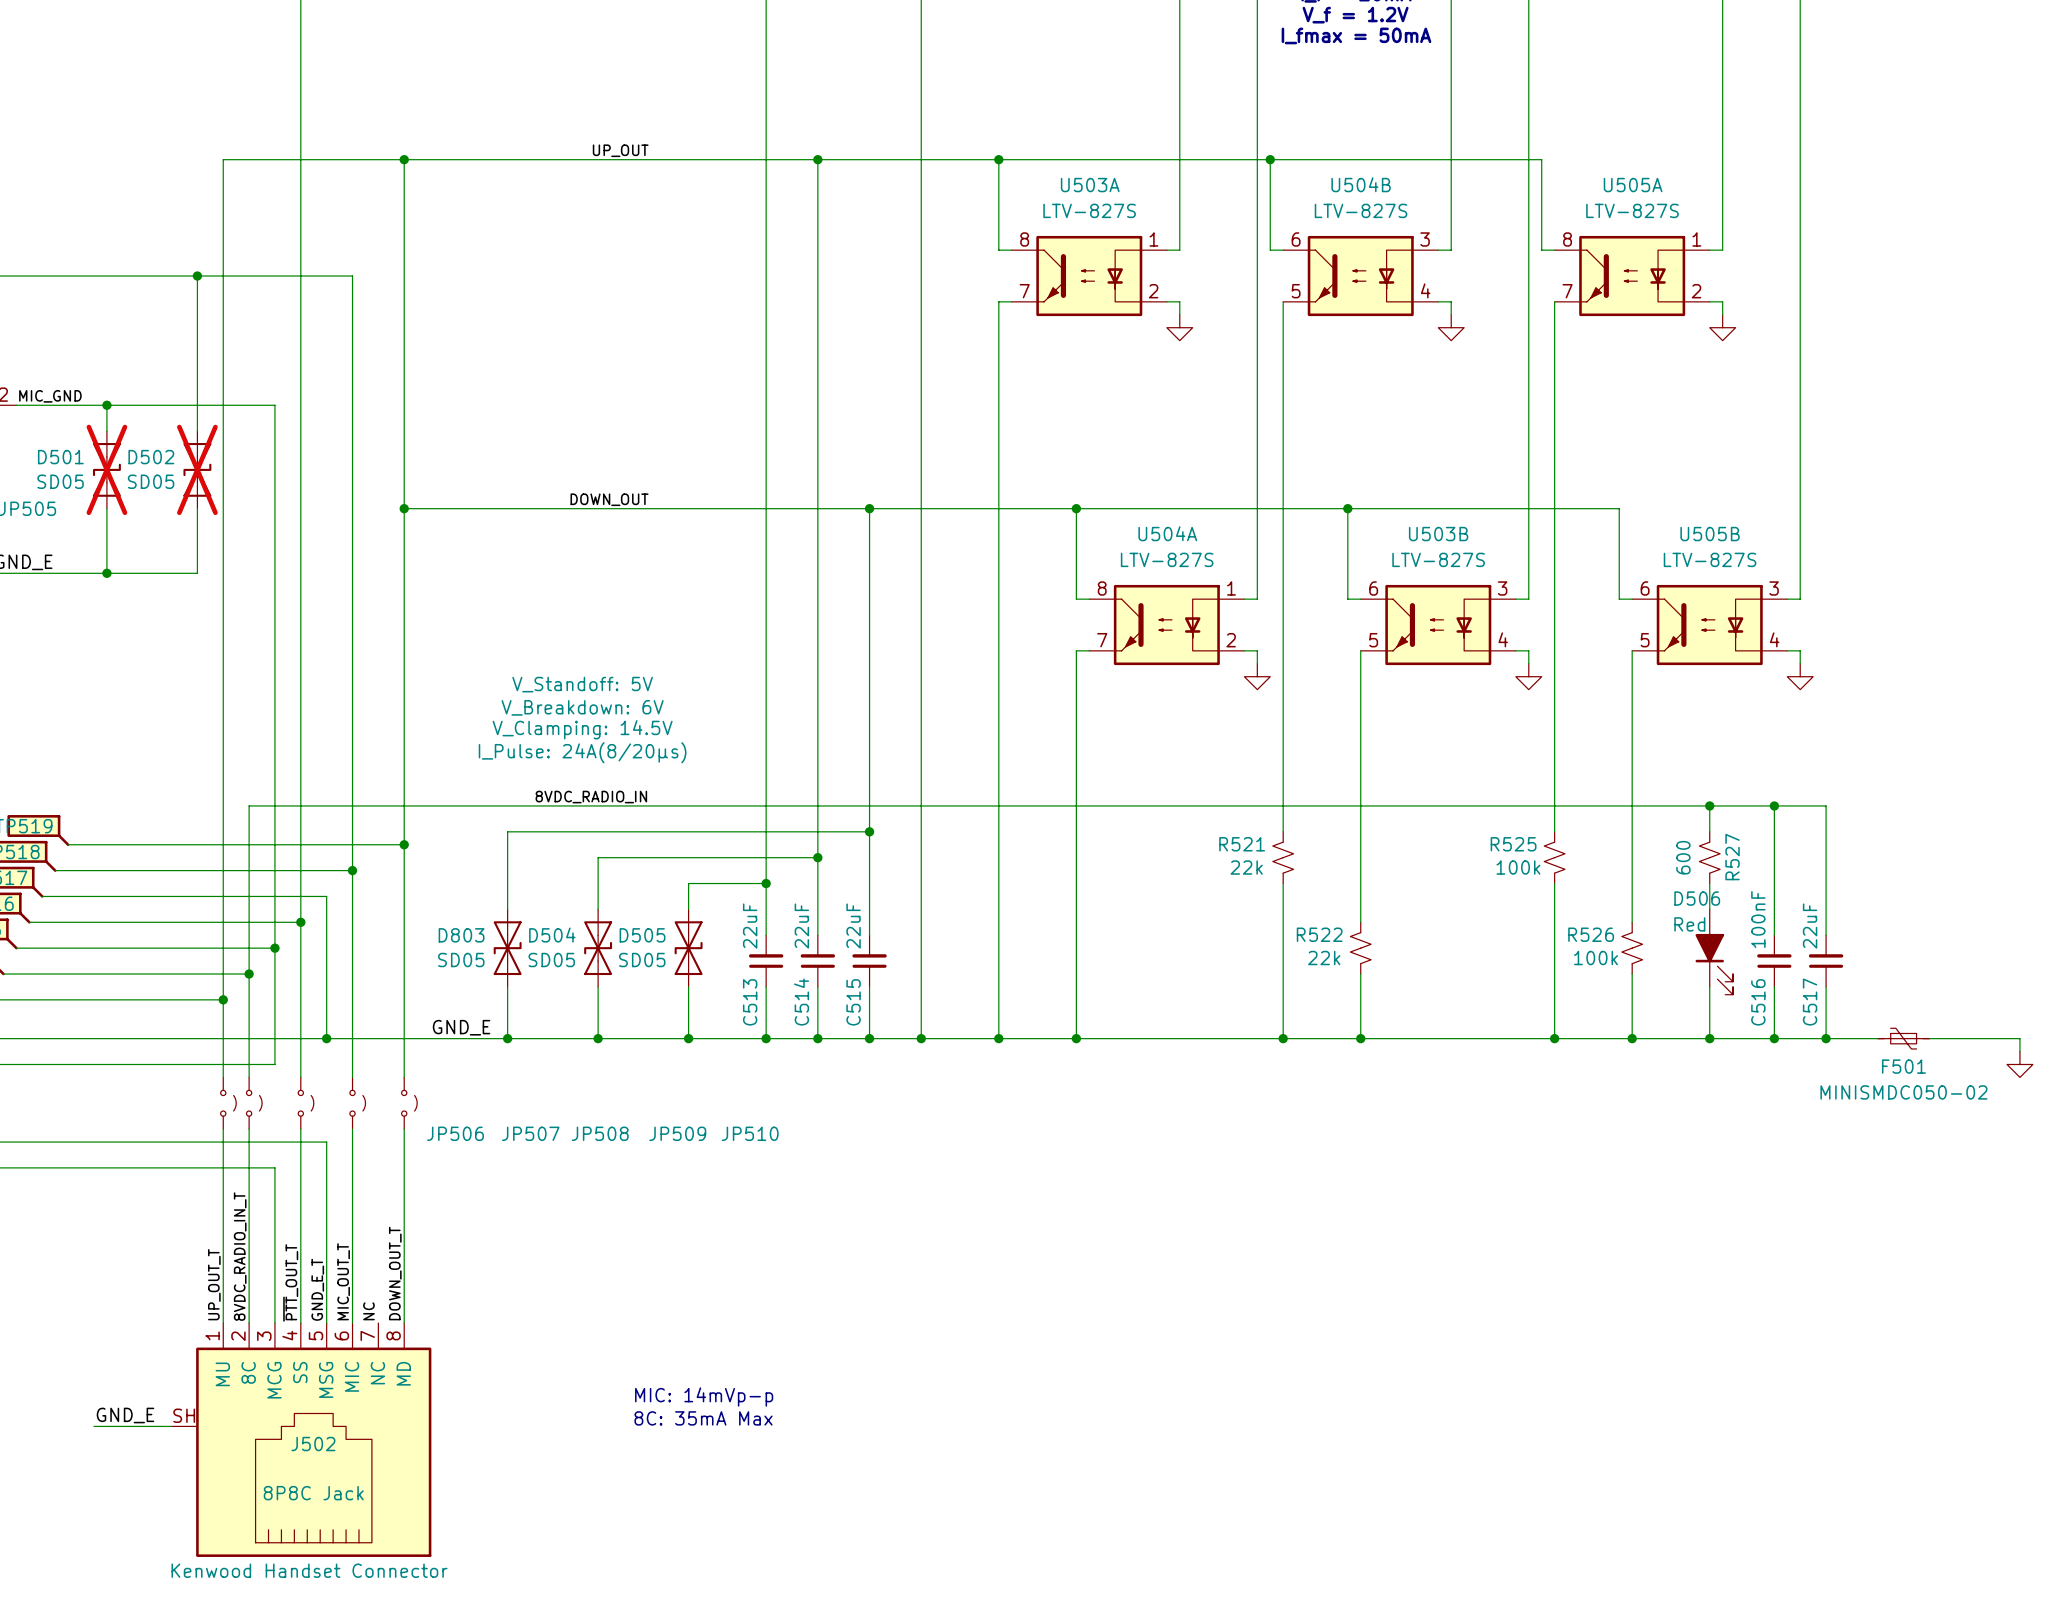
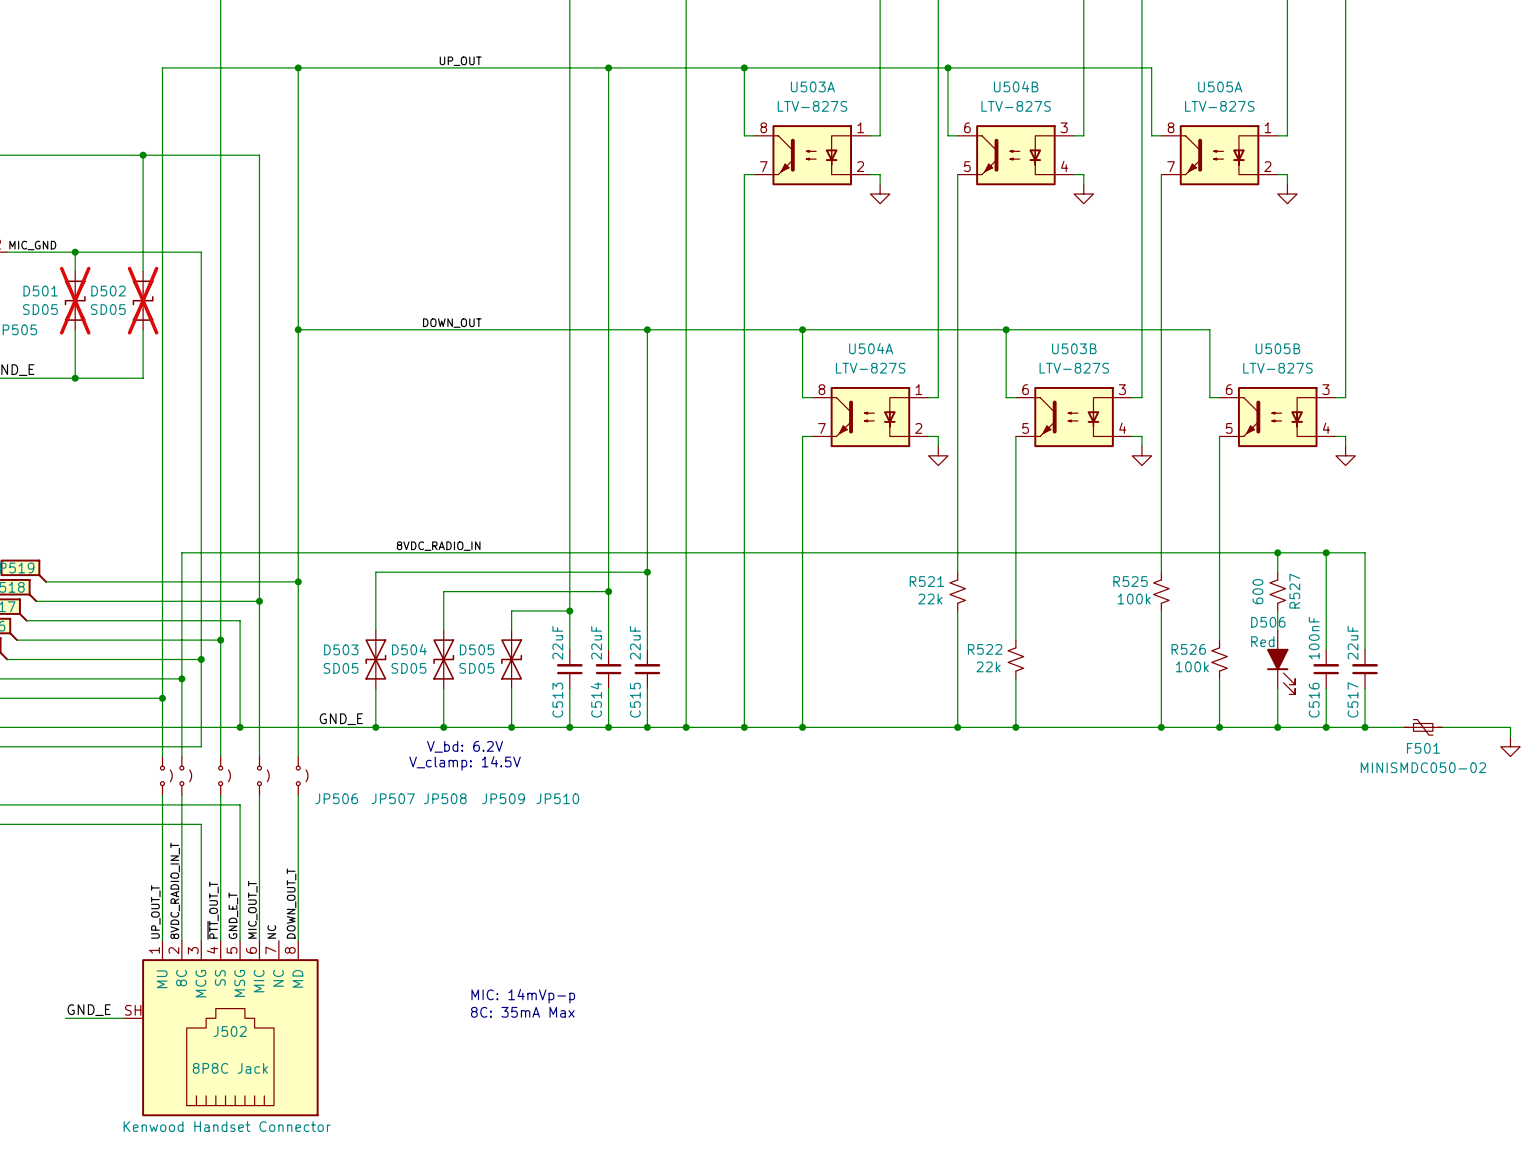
D803 text: V_Standoff: 5V (582, 684) -> none
D803 text: V_Breakdown: 6V (582, 707) -> none
D803 text: V_Clamping: 14.5V (582, 729) -> none
D803 text: I_Pulse: 24A(8/20µs) (582, 752) -> none
D803 name: D803 (461, 935) -> D503 (341, 649)
text: none -> V_bd: 6.2V (465, 746)
text: none -> V_clamp: 14.5V (465, 763)

